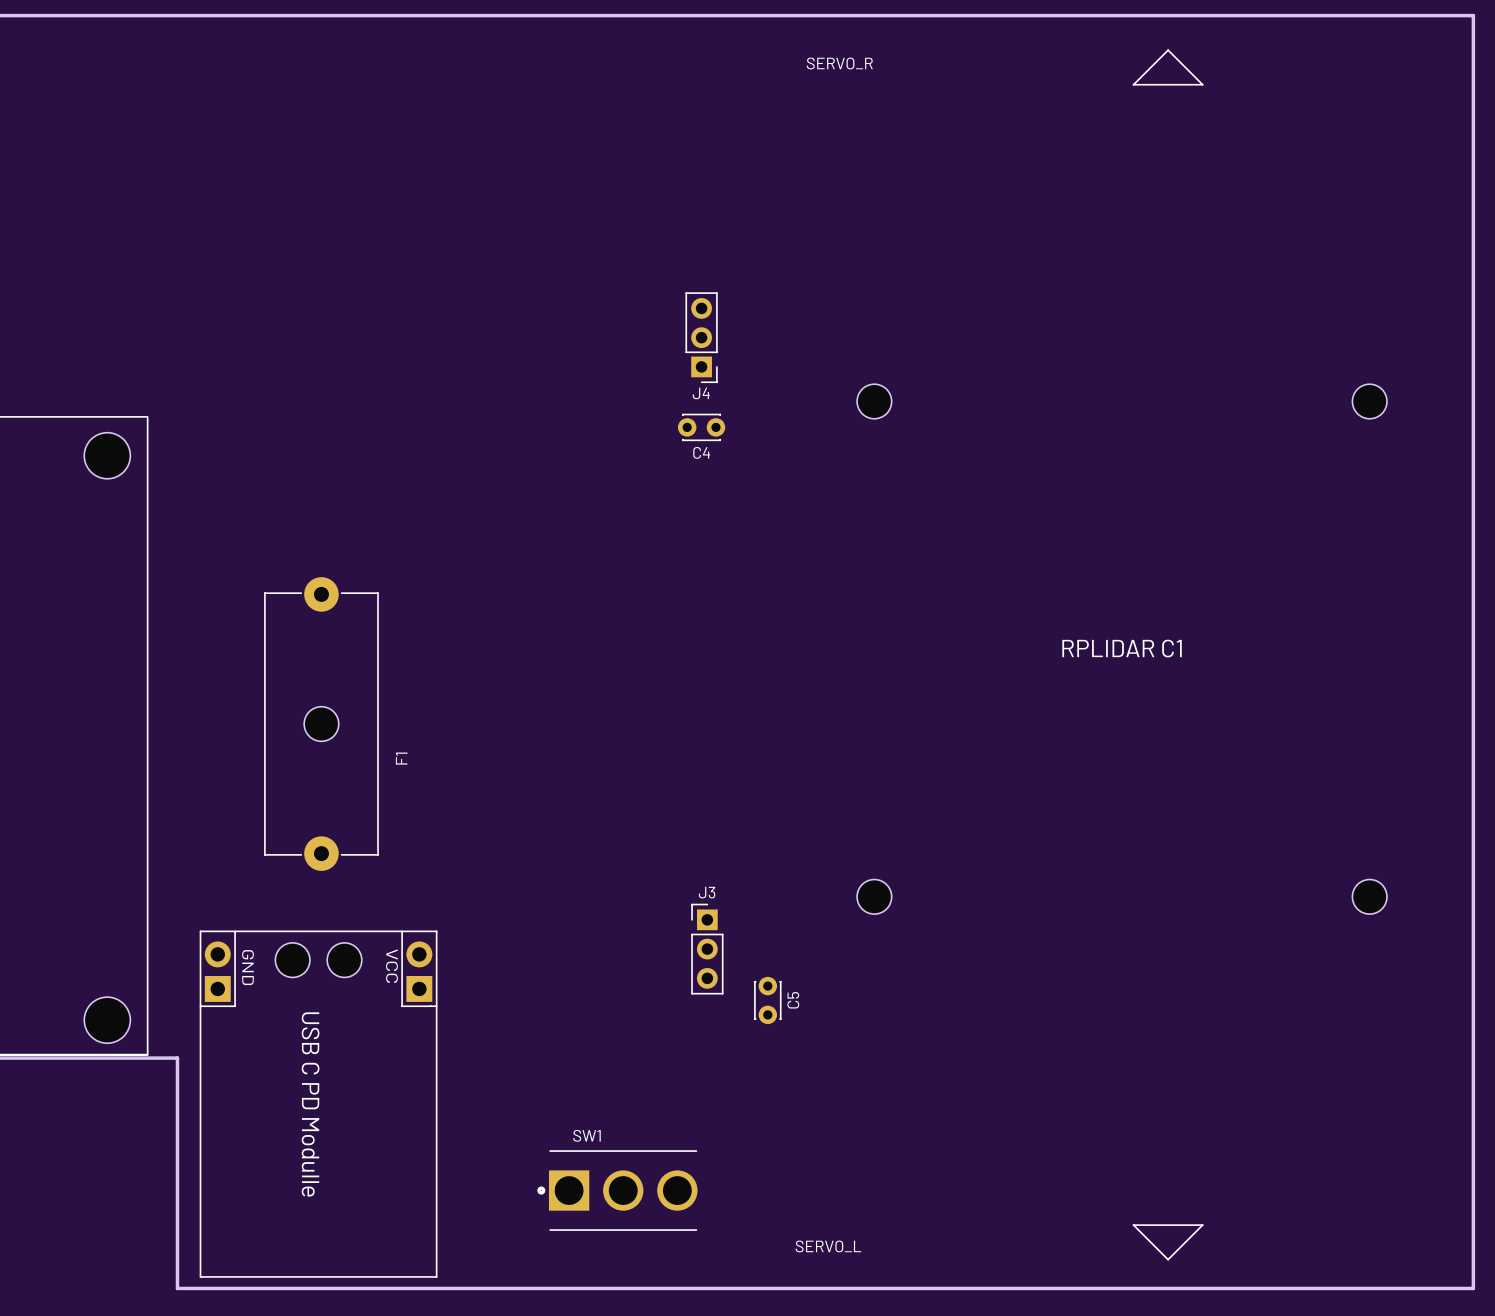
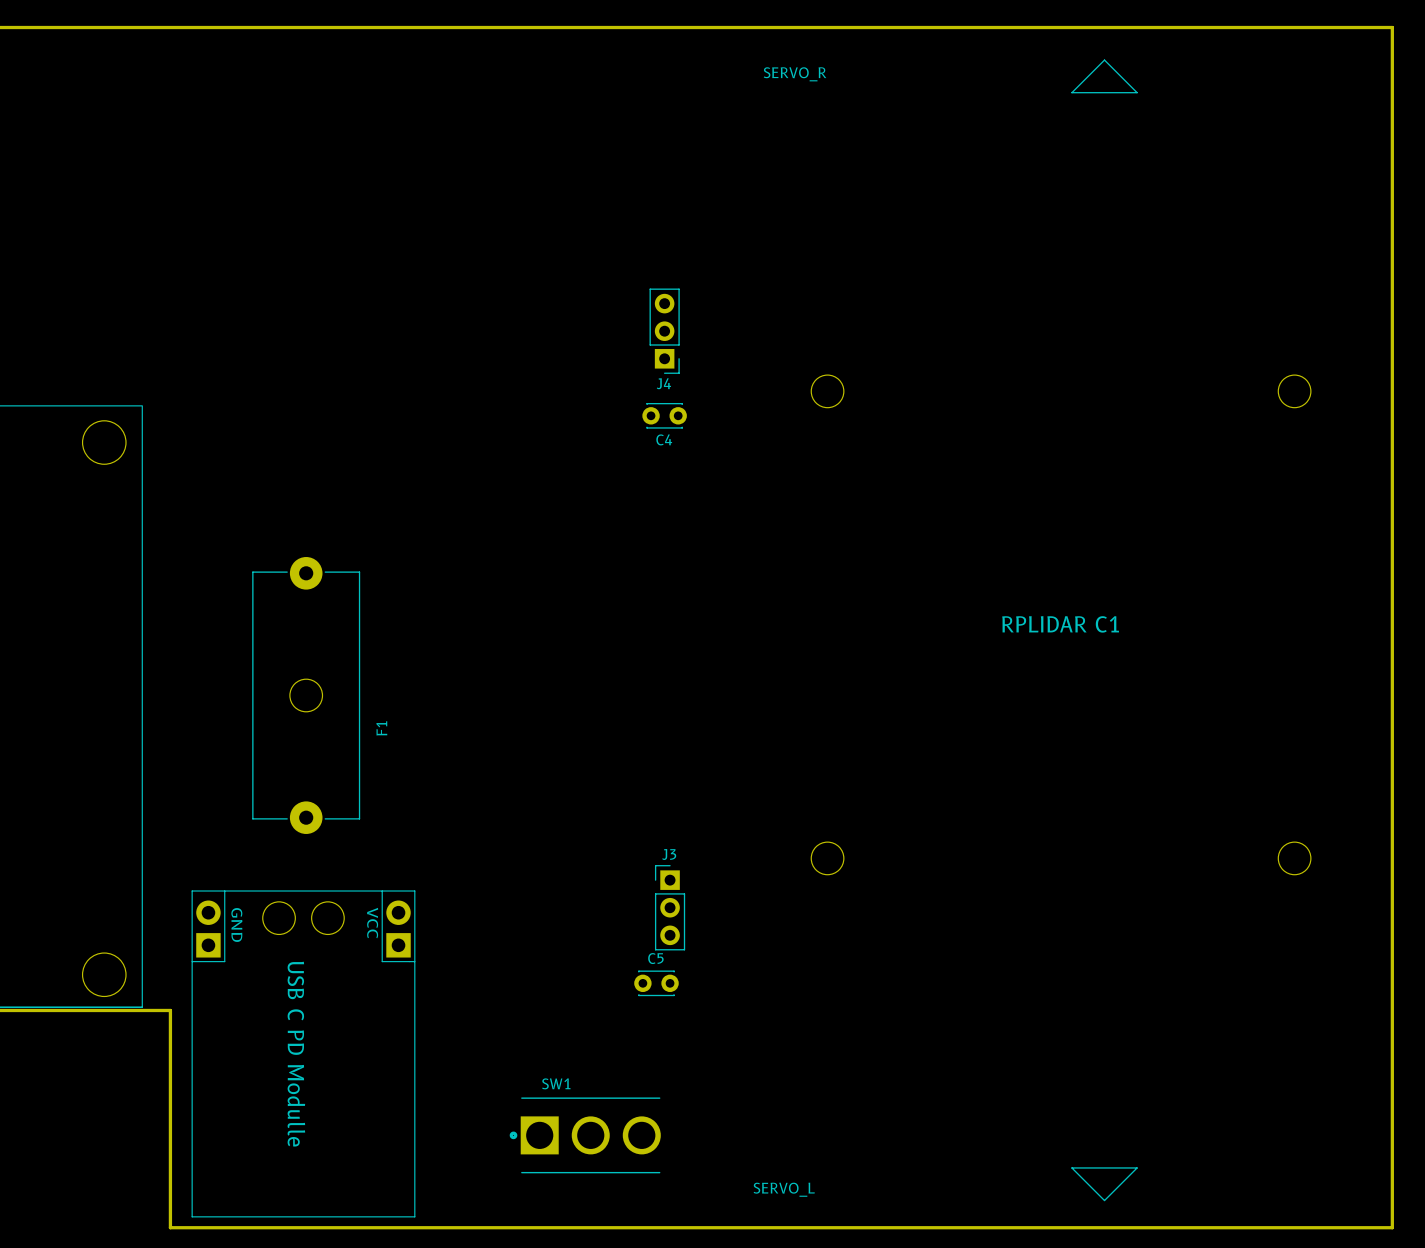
C5 rotation: 0° (767, 1000) -> 90° clockwise (656, 983)
C5 position: (767, 1000) -> (656, 983)
C5 name position: C5 (793, 1000) -> C5 (655, 958)

